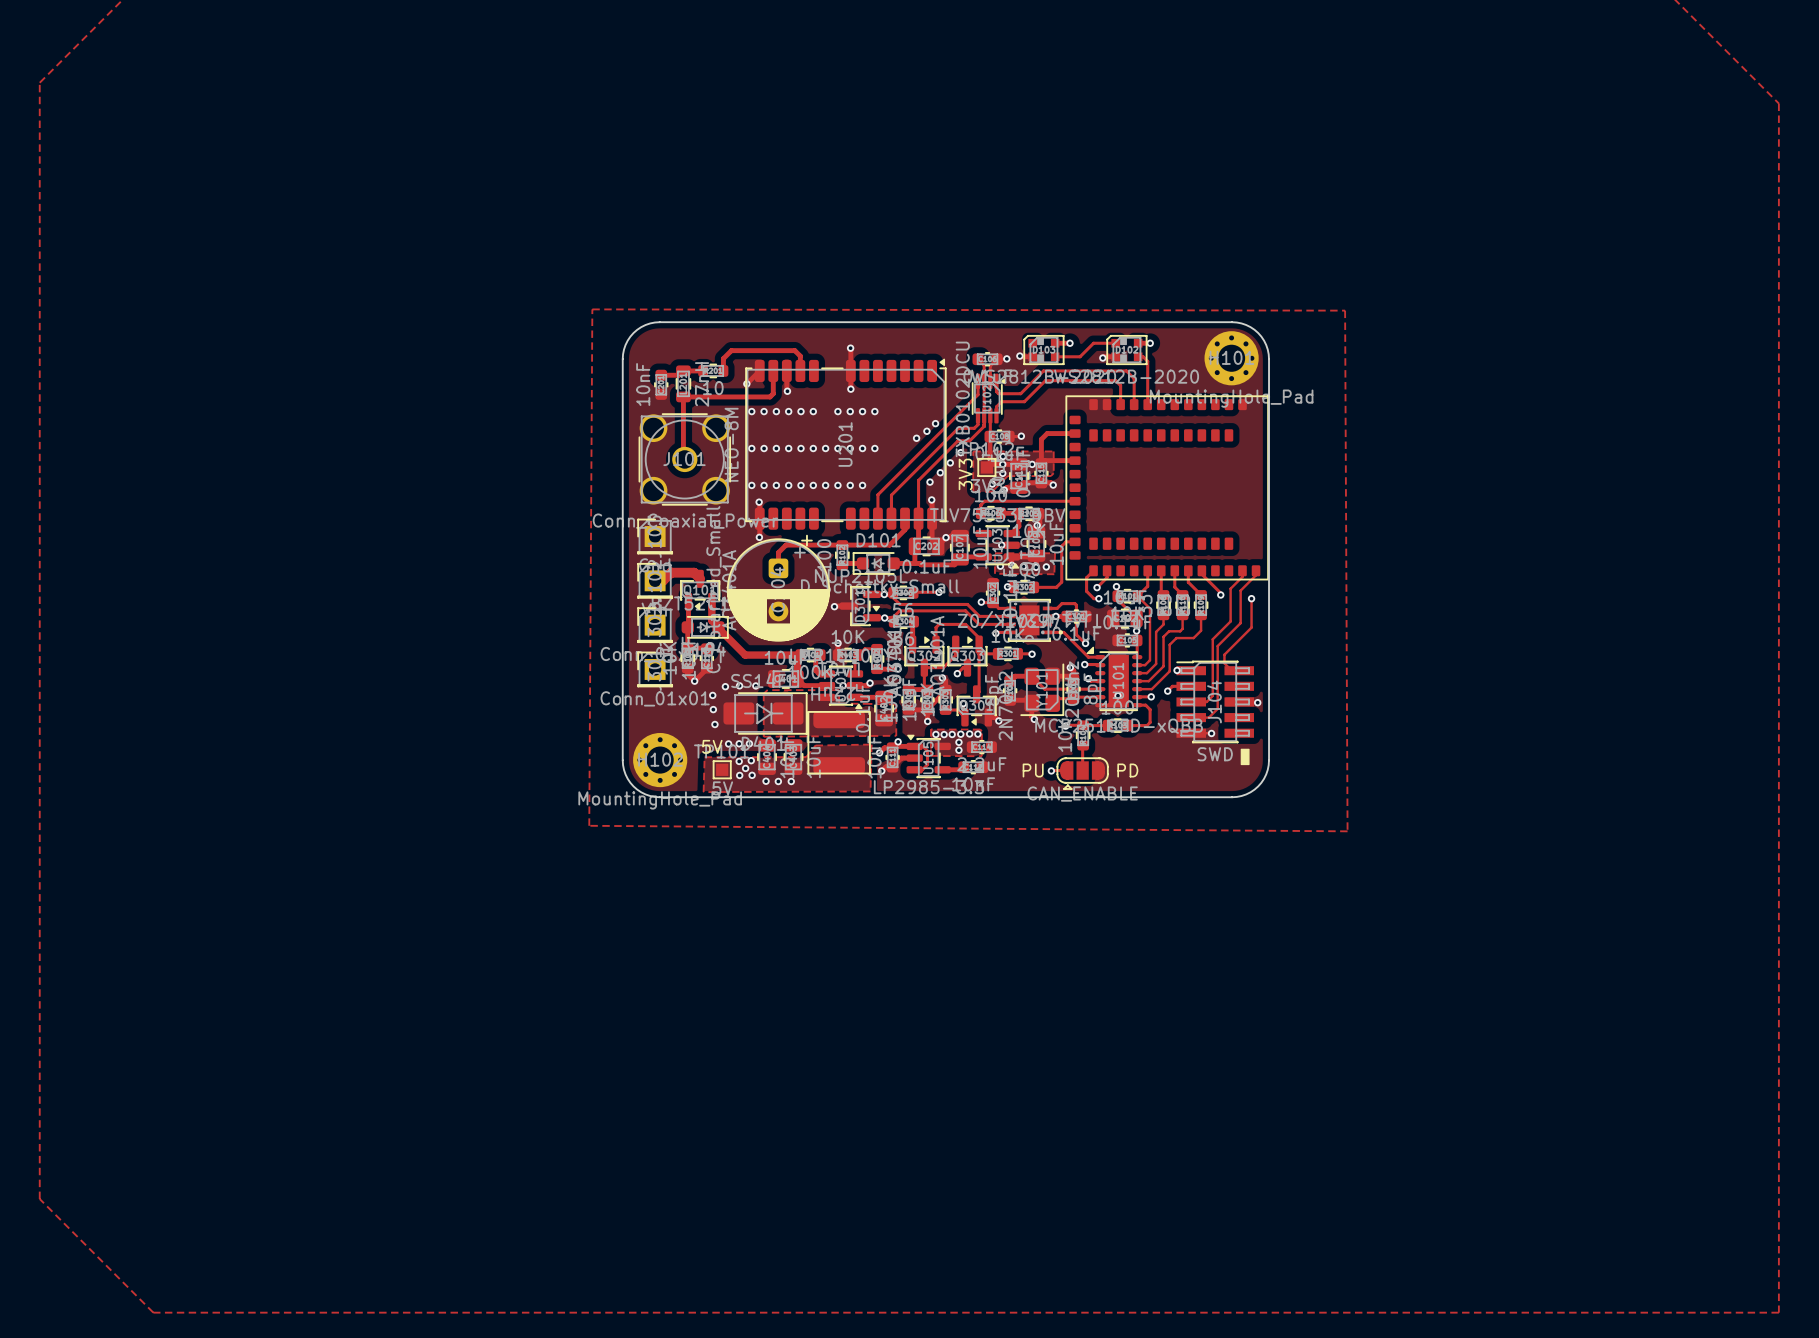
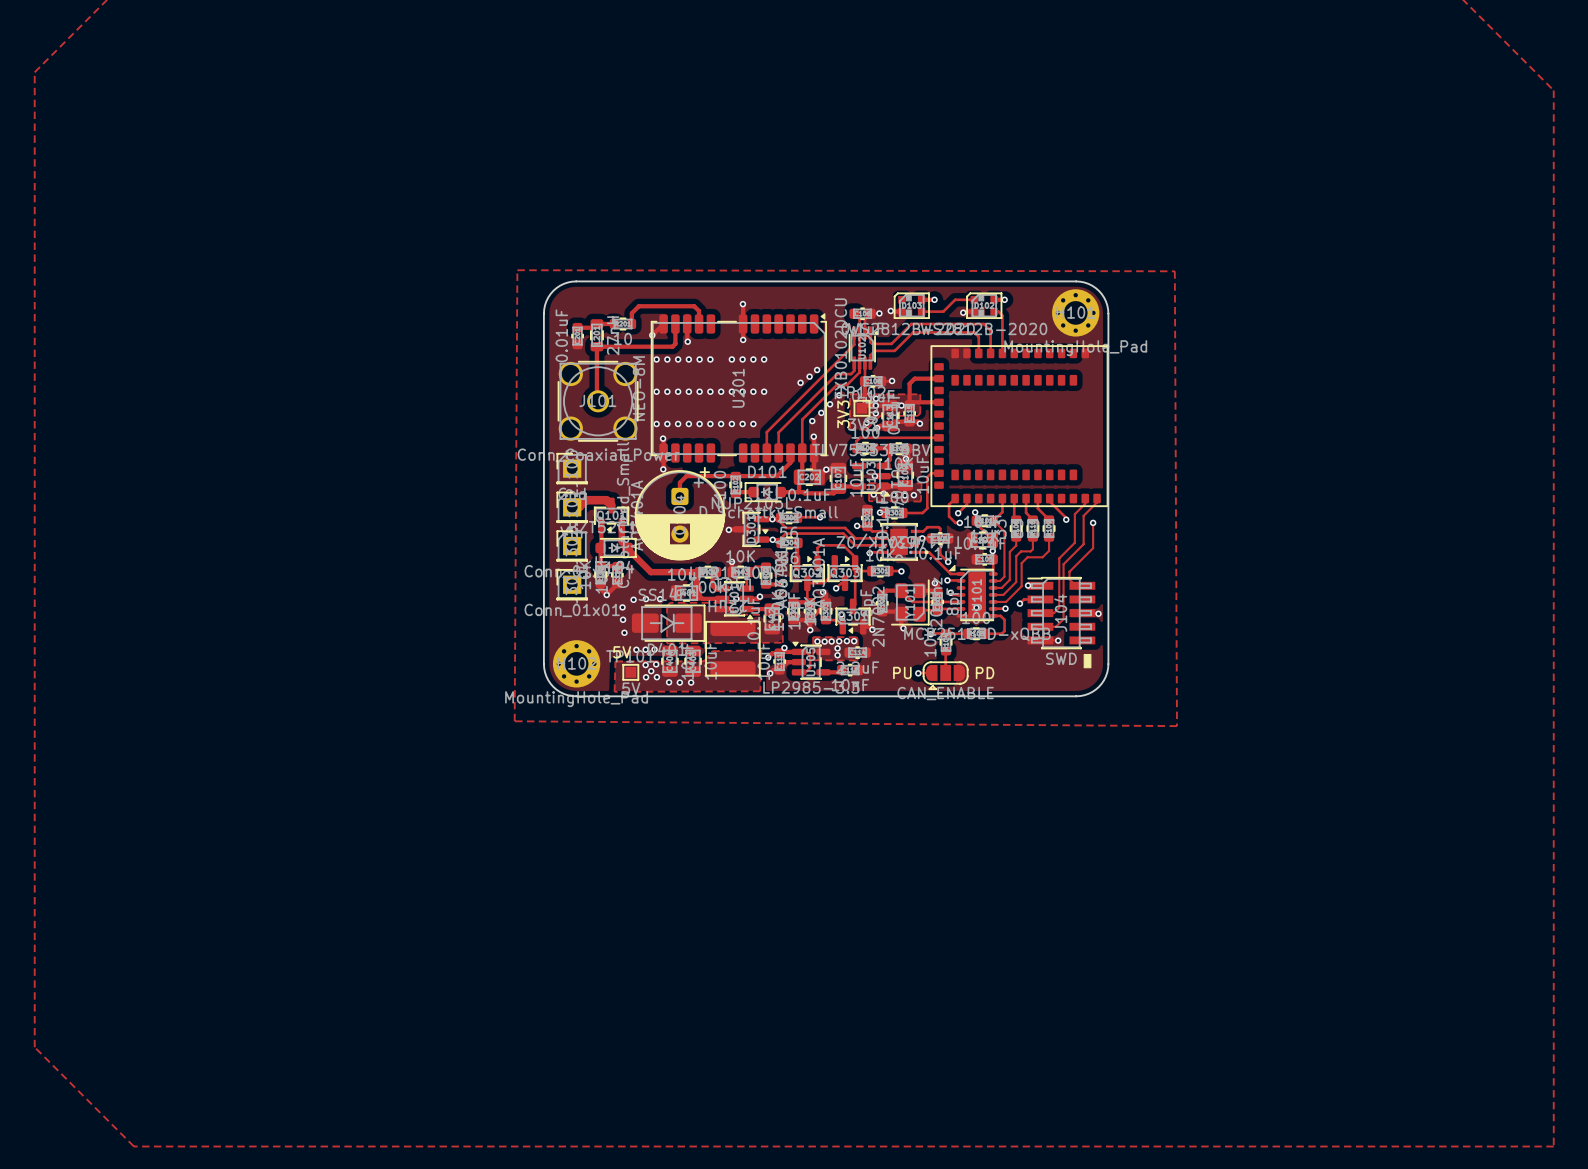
part value: 10nF (643, 384) -> 0.01uF (561, 335)

